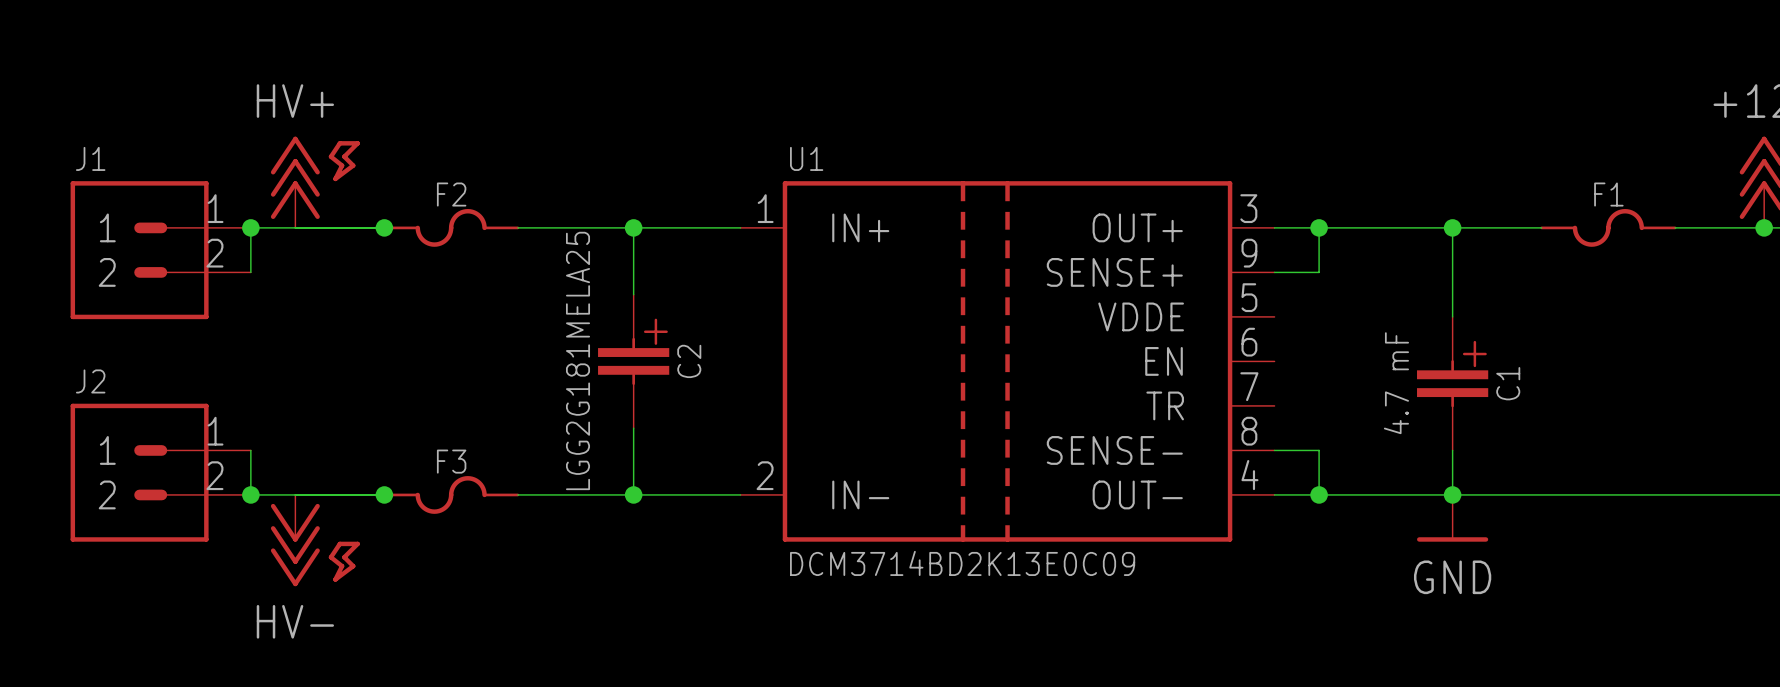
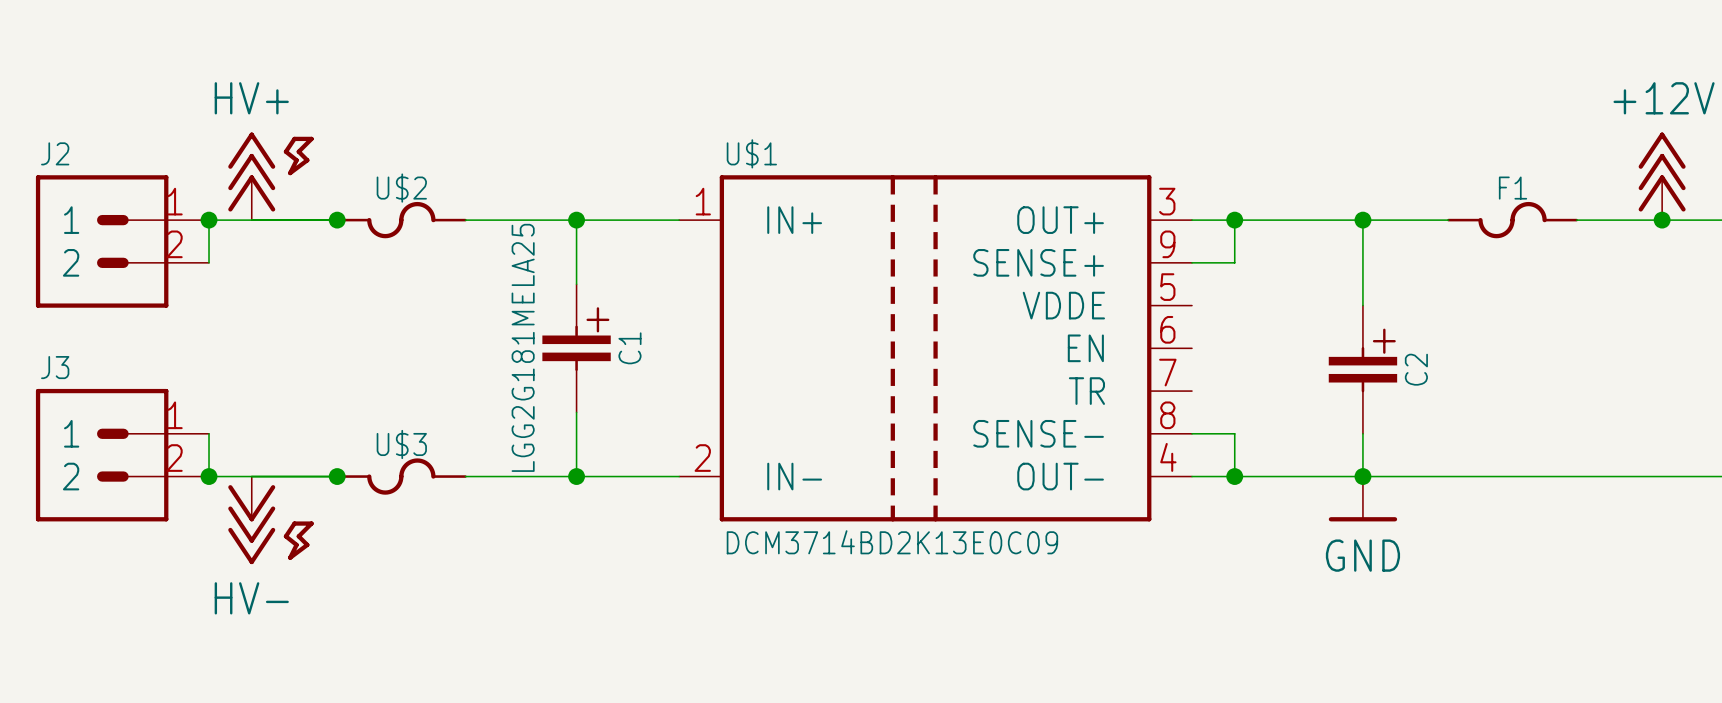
J1 name: J1 (90, 158) -> J2 (55, 153)
U1 name: U1 (806, 158) -> U$1 (751, 153)
F2 name: F2 (451, 194) -> U$2 (401, 188)
C2 name: C2 (689, 361) -> C1 (629, 348)
J2 name: J2 (90, 381) -> J3 (55, 367)
C1 value: 4.7 mF (1396, 383) -> none
C1 name: C1 (1508, 383) -> C2 (1416, 369)
F3 name: F3 (451, 461) -> U$3 (401, 444)

